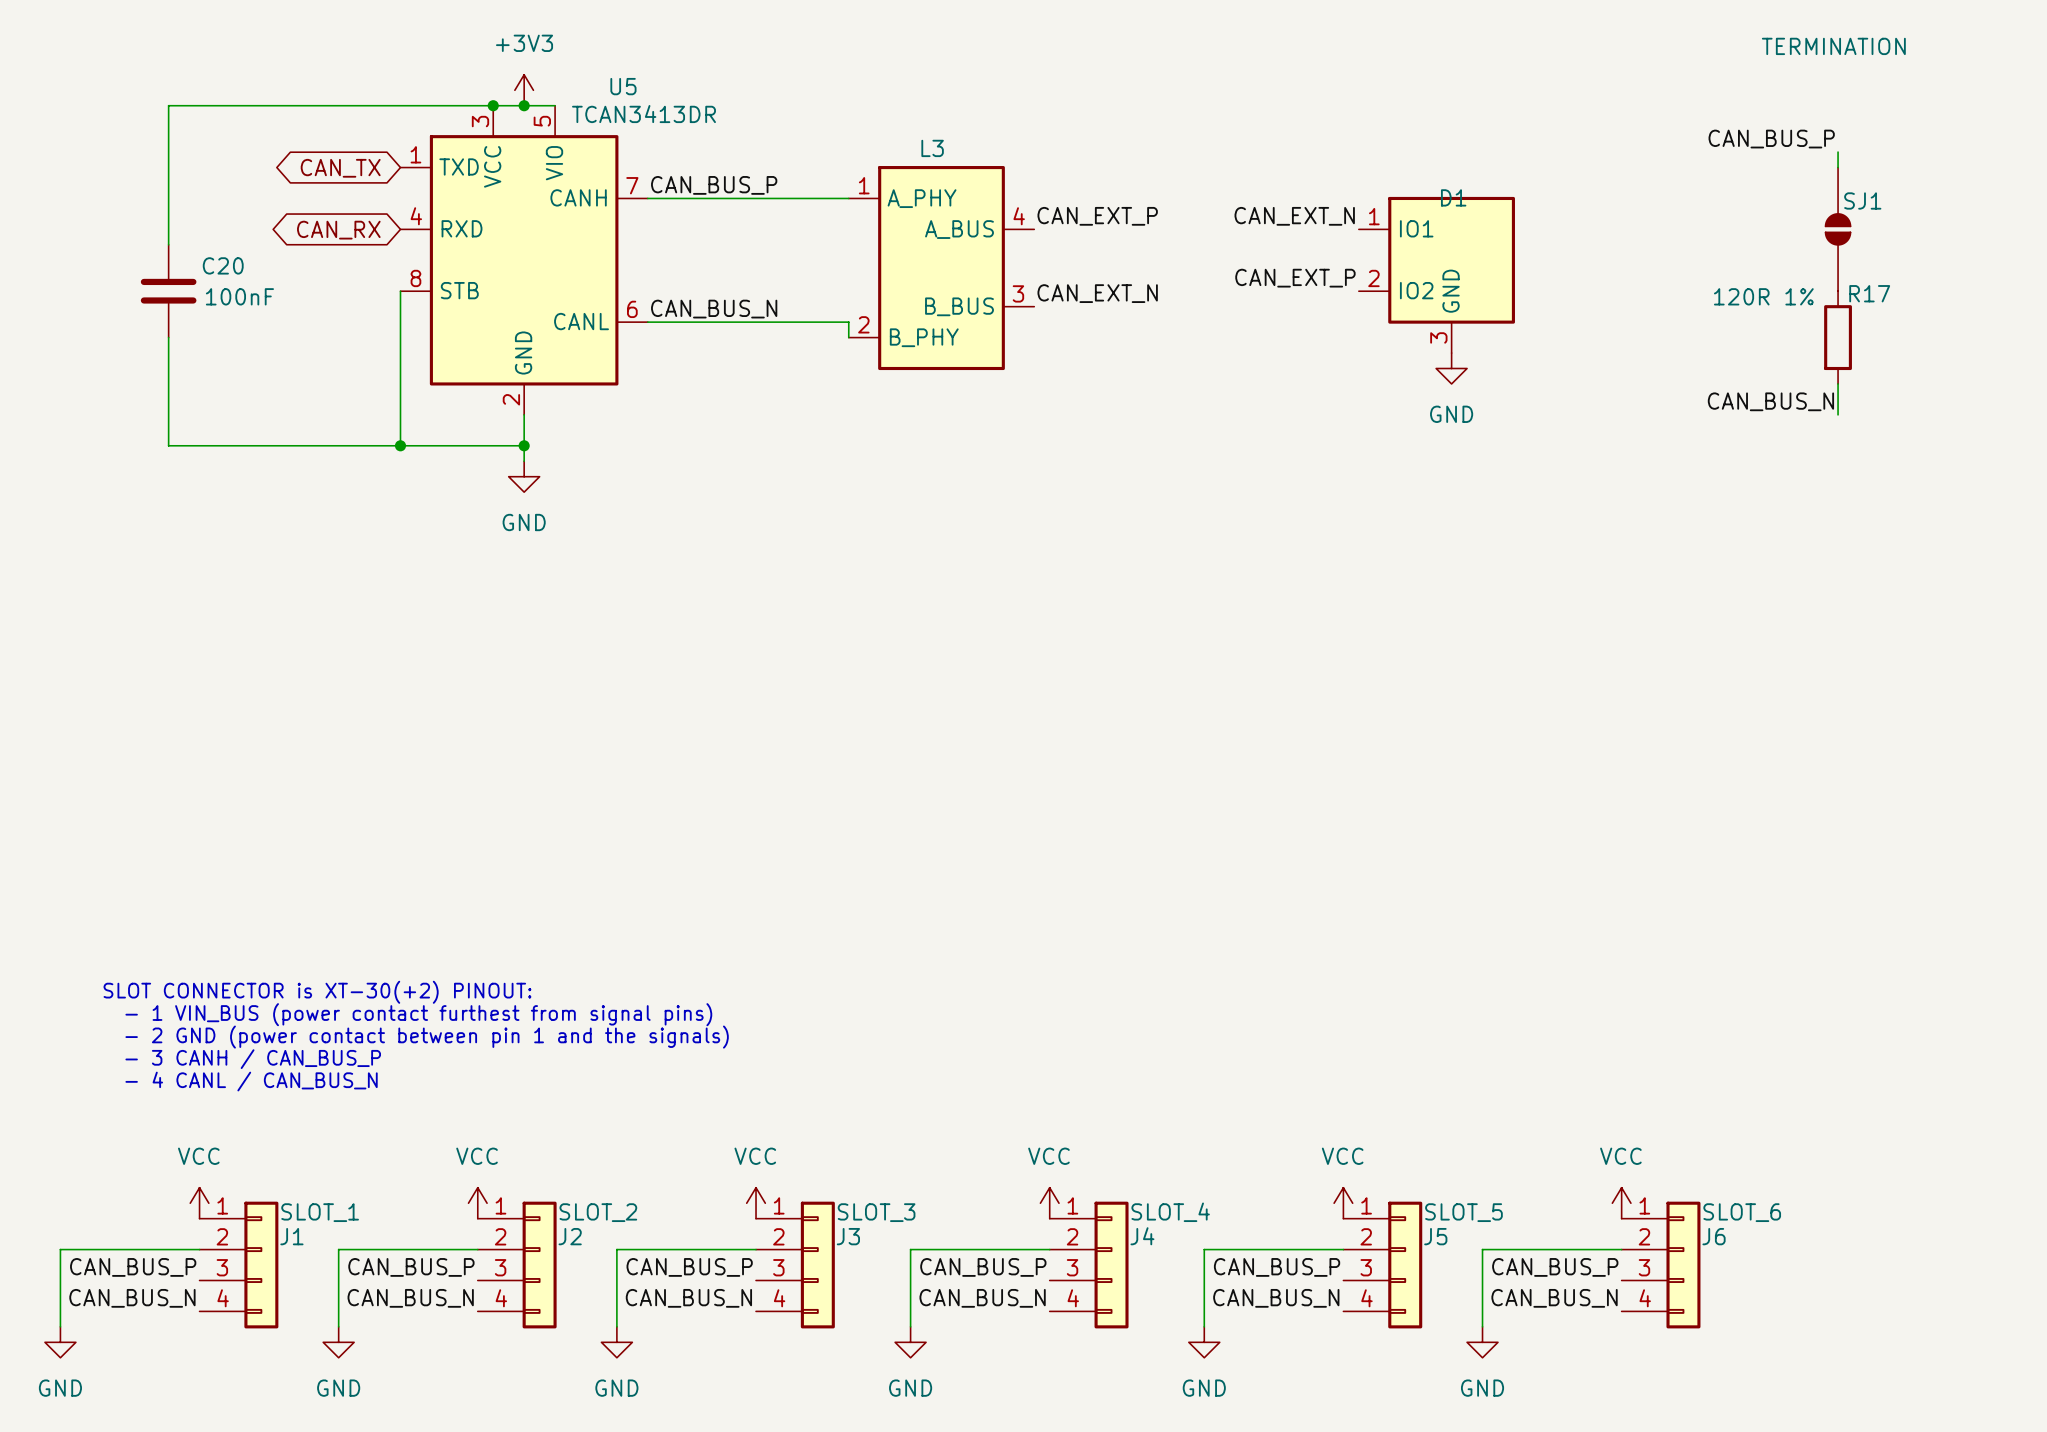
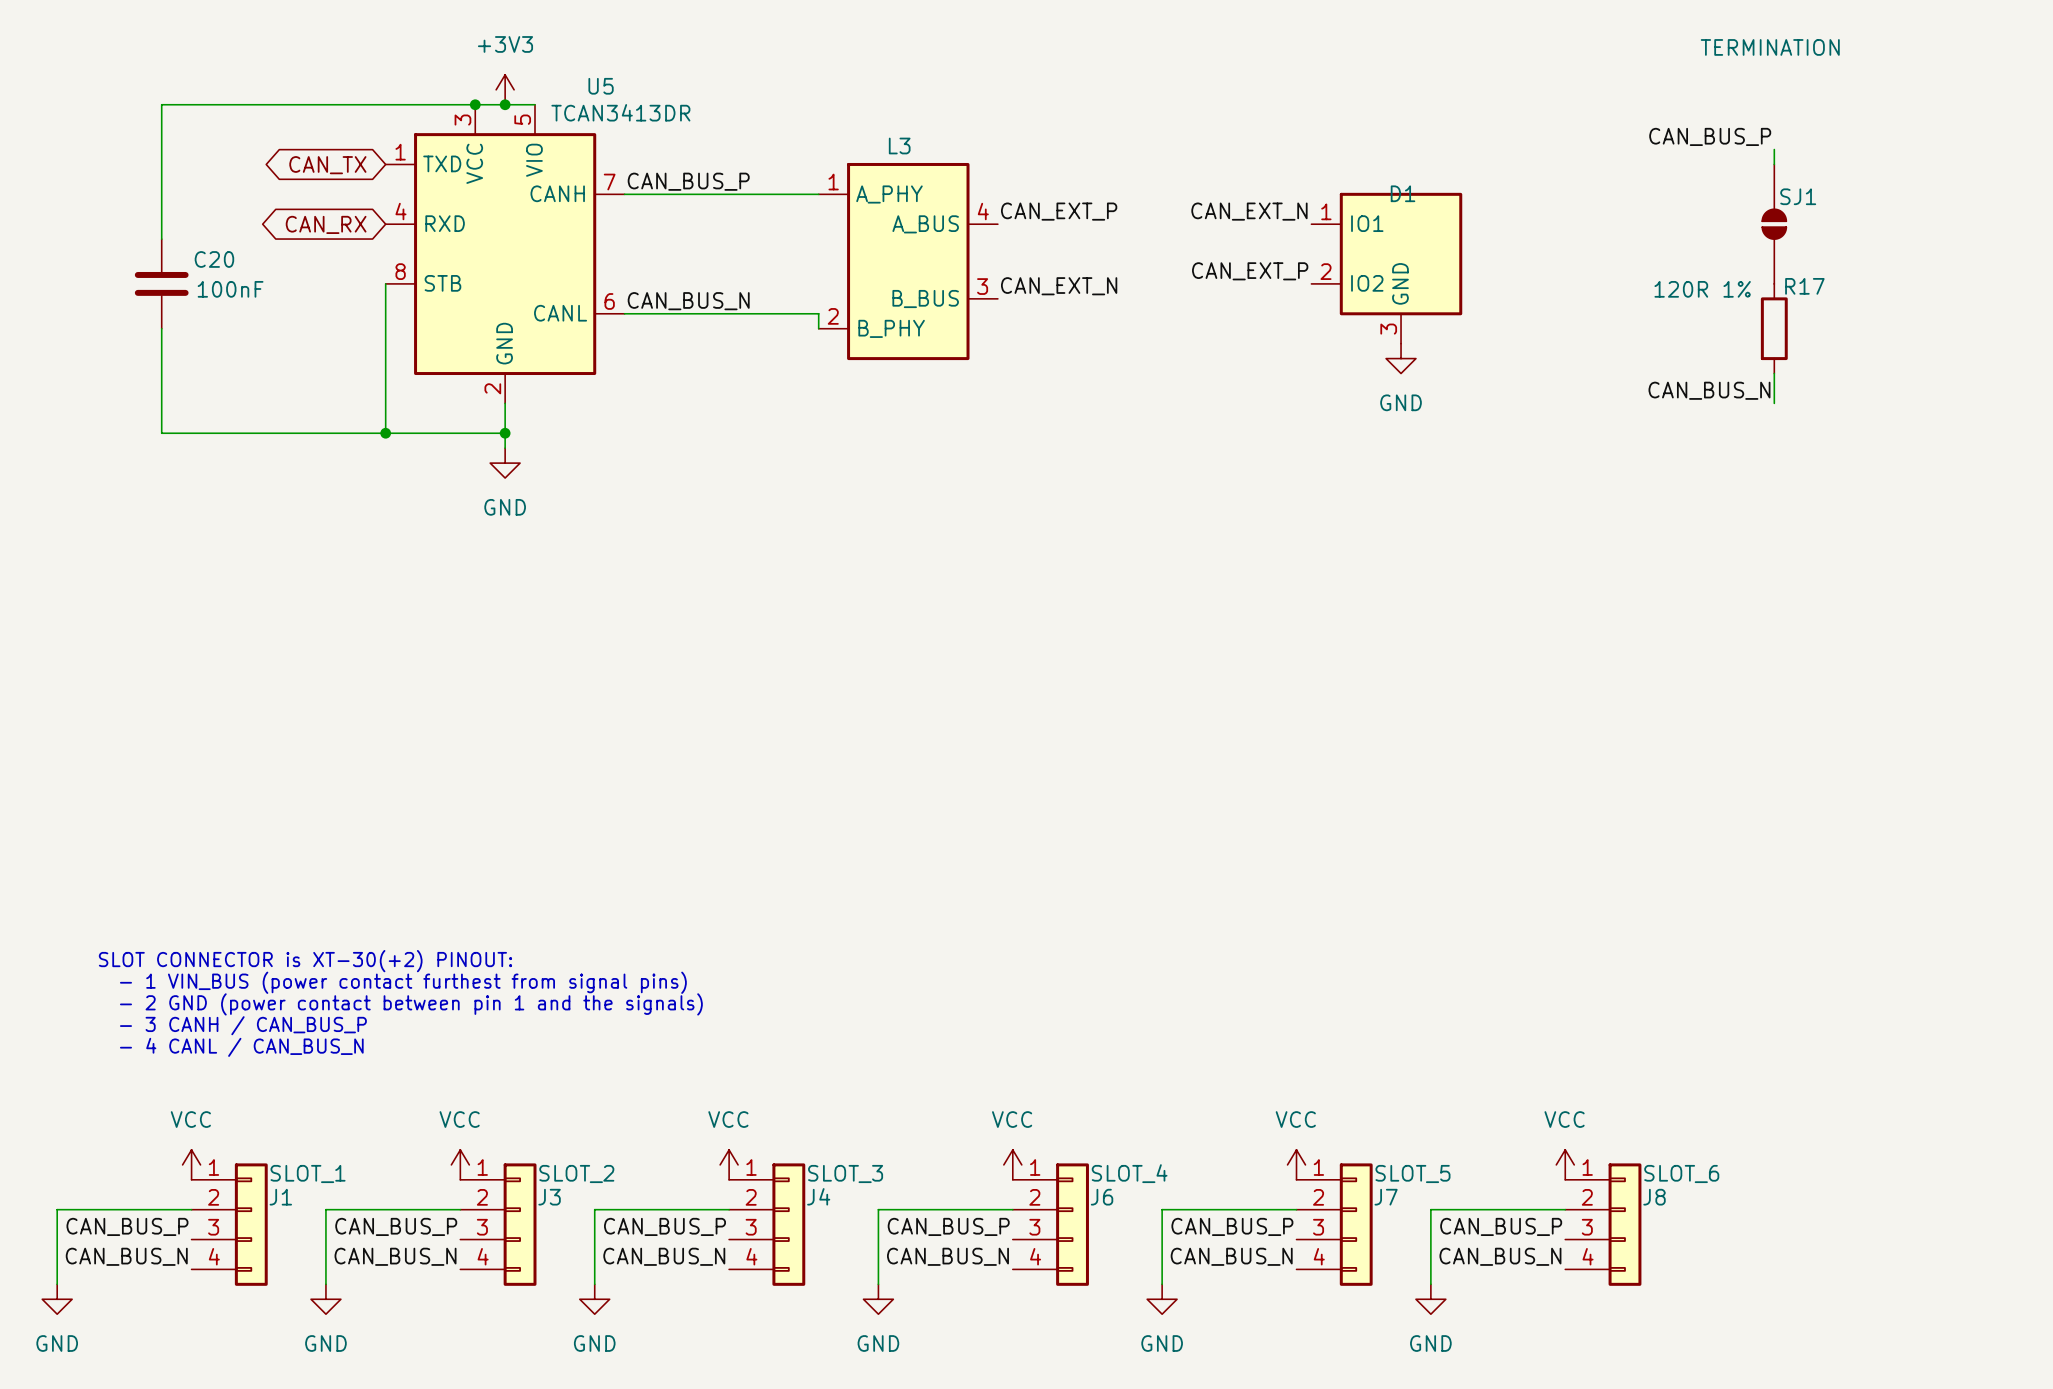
J2 name: J2 (570, 1236) -> J3 (549, 1197)
J3 name: J3 (848, 1236) -> J4 (818, 1196)
J4 name: J4 (1142, 1236) -> J6 (1102, 1197)
J5 name: J5 (1435, 1236) -> J7 (1386, 1197)
J6 name: J6 (1714, 1236) -> J8 (1654, 1197)

